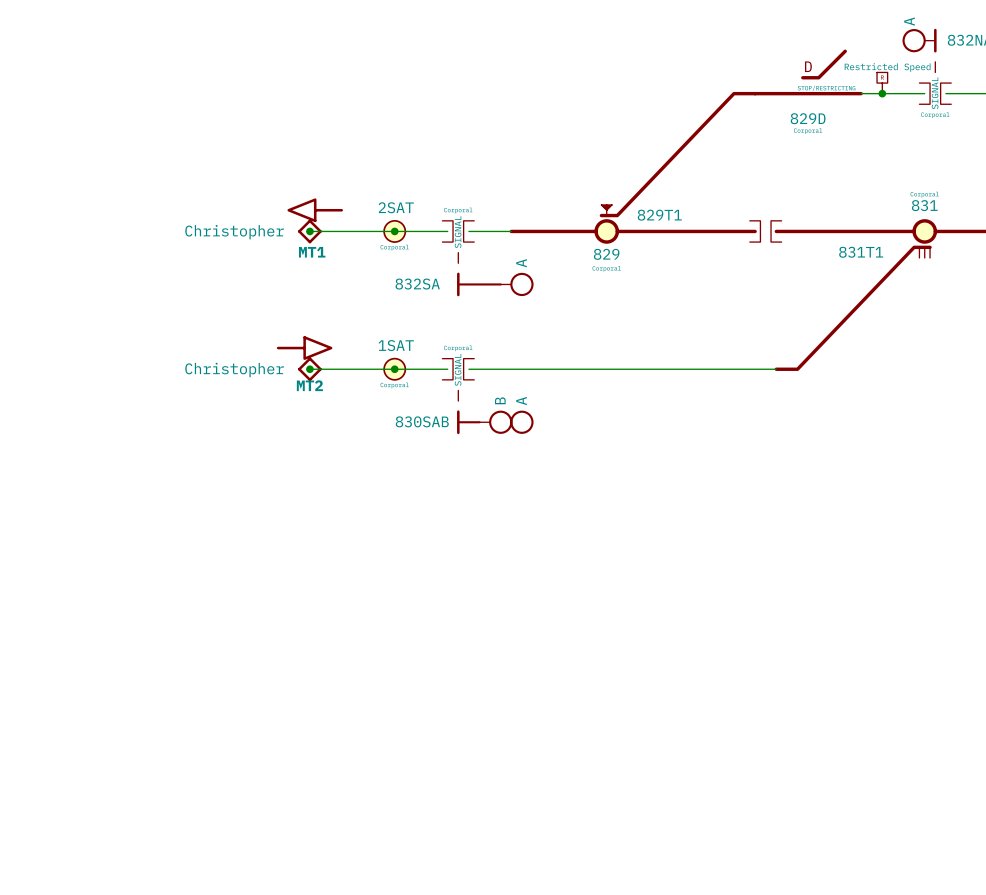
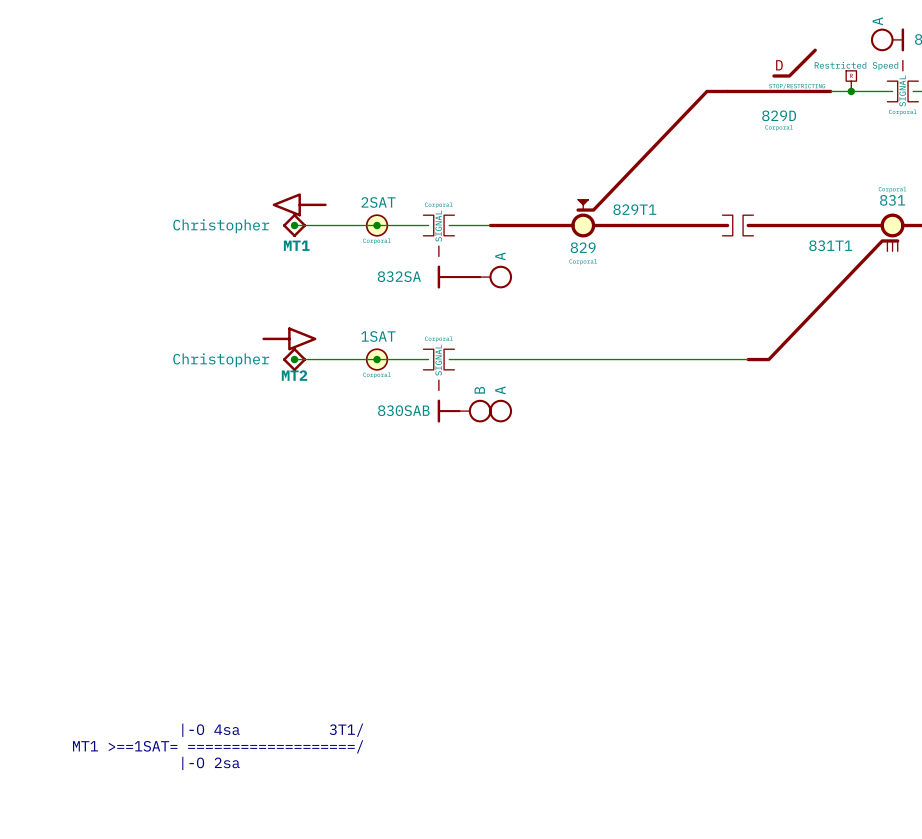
text: none -> |-O 4sa 3T1/ (272, 730)
text: none -> MT1 >==1SAT= ===================/ (218, 746)
text: none -> |-O 2sa (210, 763)

